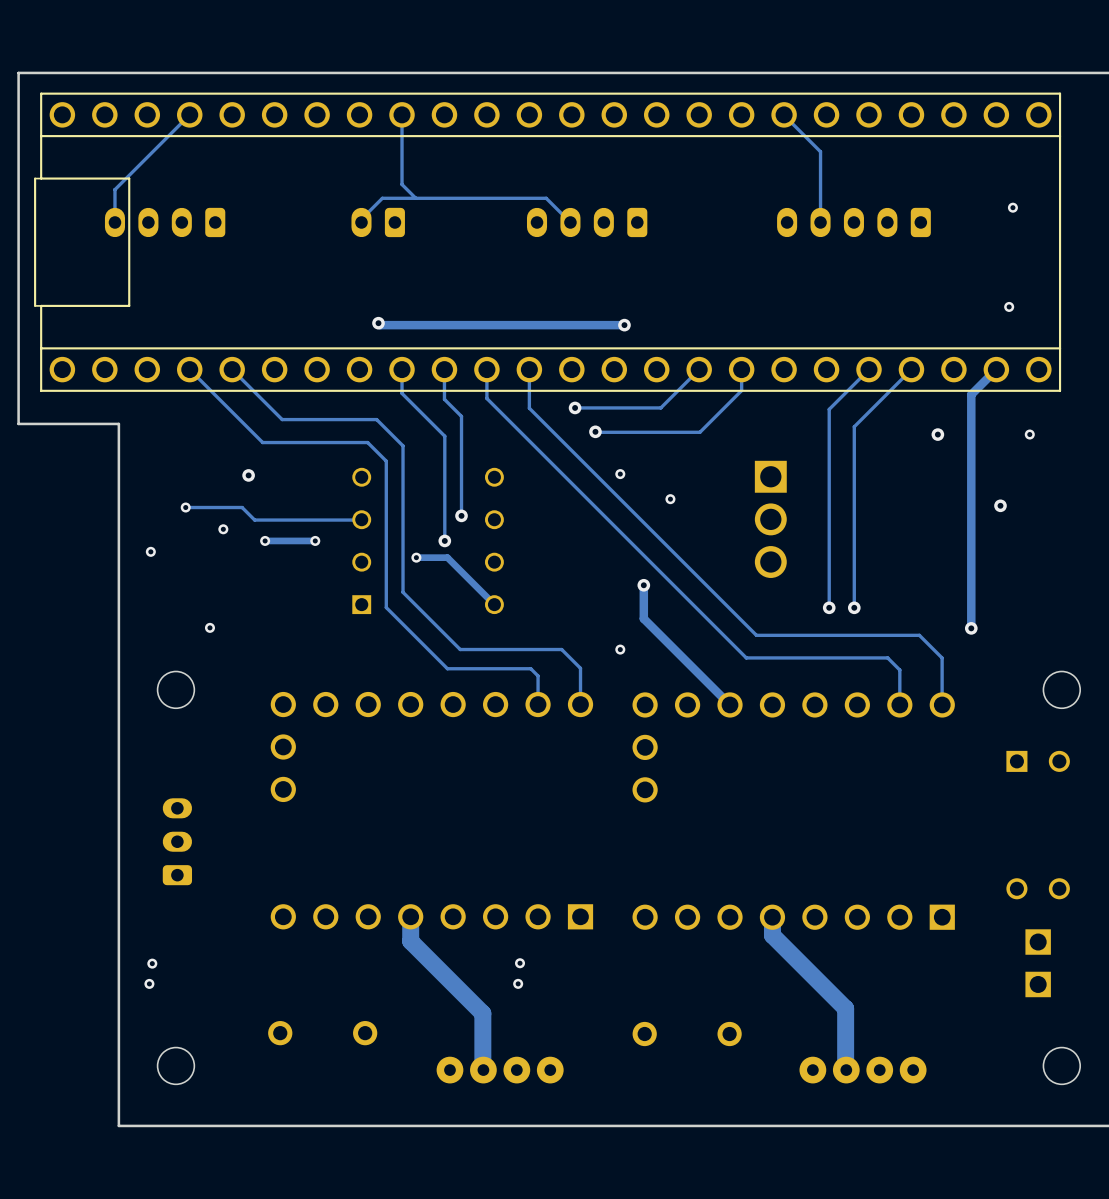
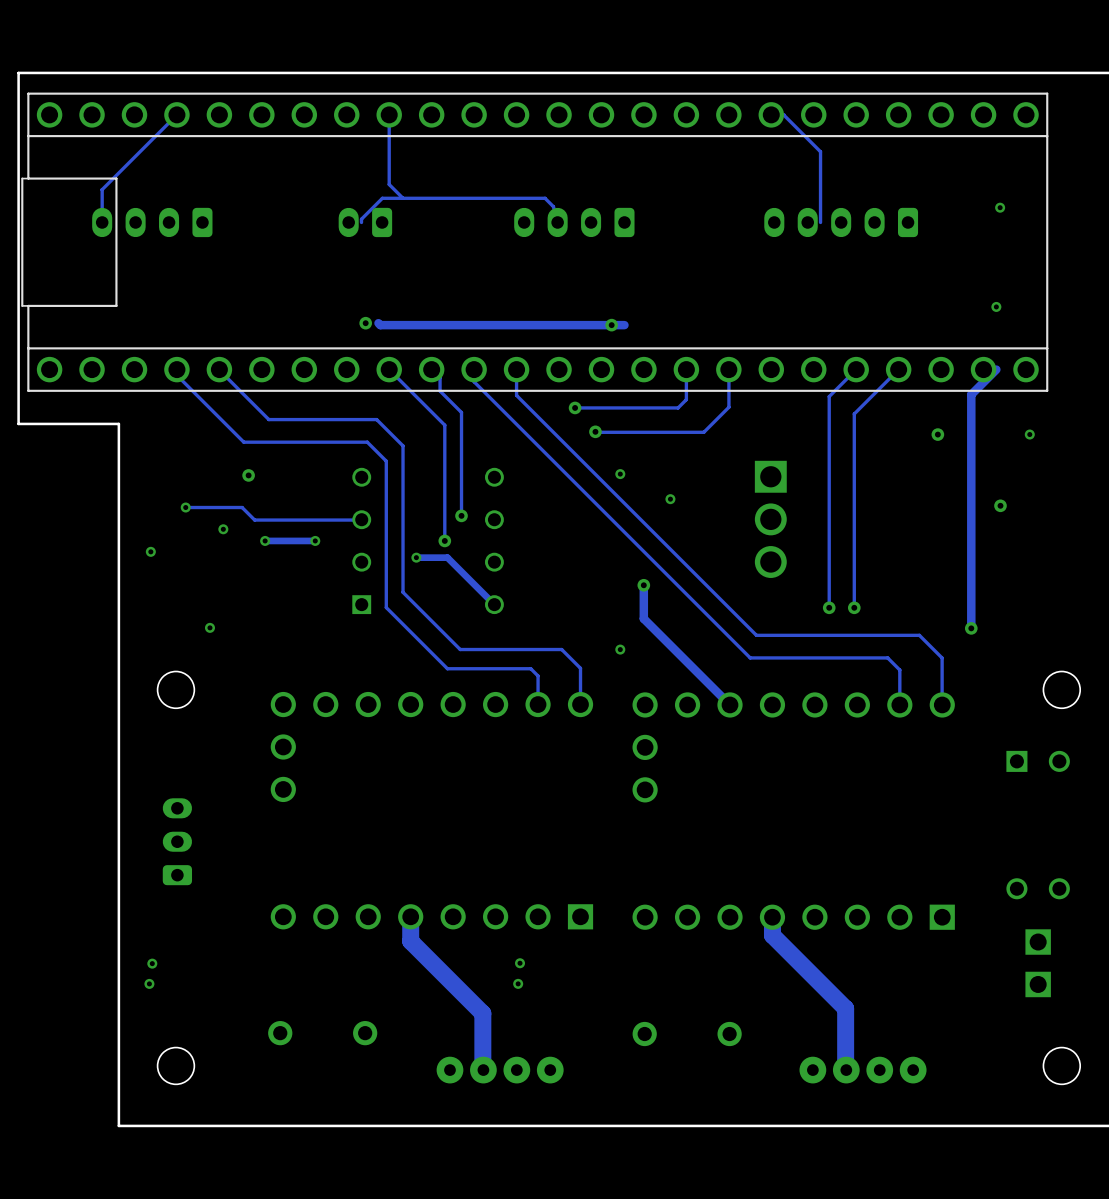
track: (189, 114) (114, 189) (114, 222) -> (176, 114) (102, 189) (102, 222)
track: (402, 114) (402, 184) (415, 198) -> (389, 114) (389, 184) (403, 198)
track: (545, 198) (570, 222) -> (545, 198) (553, 206) (557, 222)
via position: (1012, 207) -> (1000, 207)
part position: (165, 222) -> (152, 222)
part position: (378, 222) -> (365, 222)
part position: (587, 222) -> (574, 222)
part position: (853, 222) -> (841, 222)
part position: (547, 242) -> (534, 242)
via position: (1009, 306) -> (996, 306)
via position: (378, 323) -> (365, 323)
via position: (624, 325) -> (611, 325)
track: (189, 369) (262, 442) (367, 442) -> (176, 375) (243, 442) (367, 442)
track: (232, 369) (282, 419) -> (219, 370) (268, 419) (282, 419)
track: (402, 369) (402, 393) (444, 436) -> (389, 369) (444, 425) (444, 436)
track: (444, 369) (444, 399) (461, 416) -> (431, 369) (440, 377) (440, 391) (461, 412) (461, 416)
track: (486, 369) (486, 398) (746, 657) (750, 657) -> (474, 369) (474, 381) (750, 657)
track: (529, 369) (529, 408) -> (516, 369) (516, 395) (529, 408)
track: (699, 369) (660, 407) -> (686, 369) (686, 399) (678, 407) (660, 407)
track: (741, 369) (741, 390) (699, 432) -> (728, 369) (728, 407) (703, 432) (699, 432)
track: (869, 369) (829, 409) -> (856, 369) (829, 396) (829, 409)
track: (911, 371) (911, 369) (854, 426) -> (898, 369) (854, 413) (854, 426)

